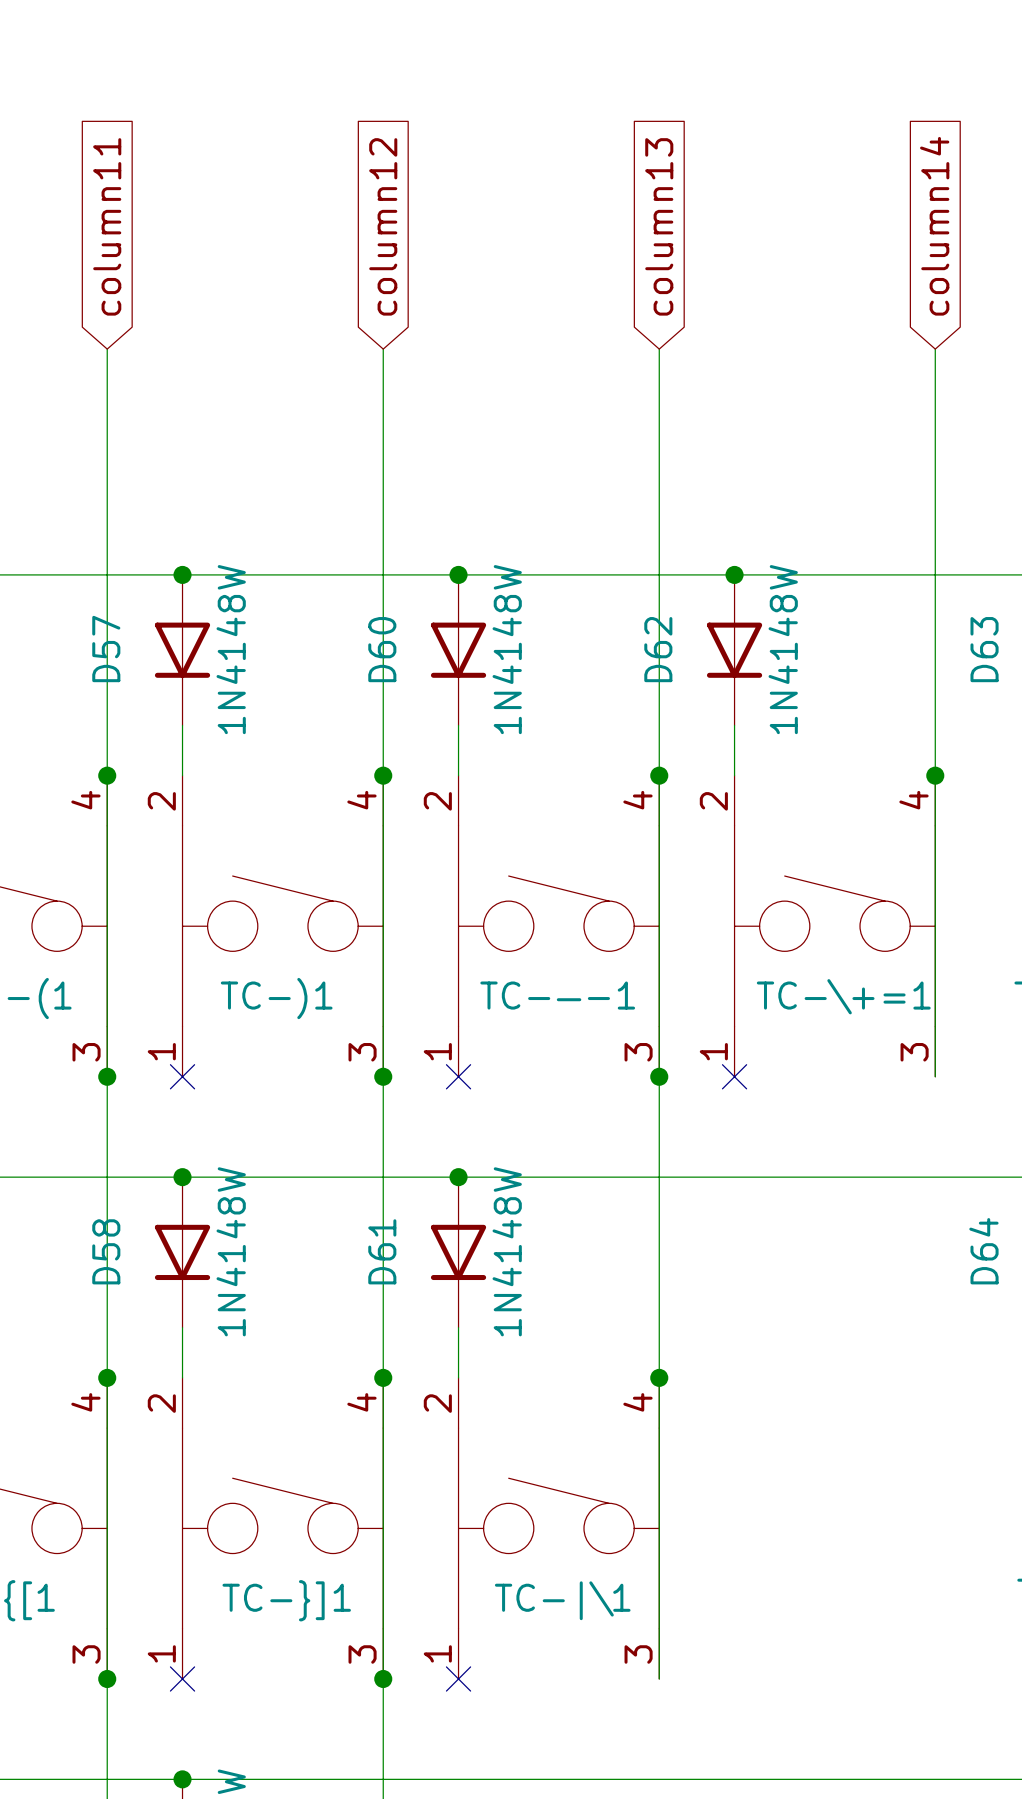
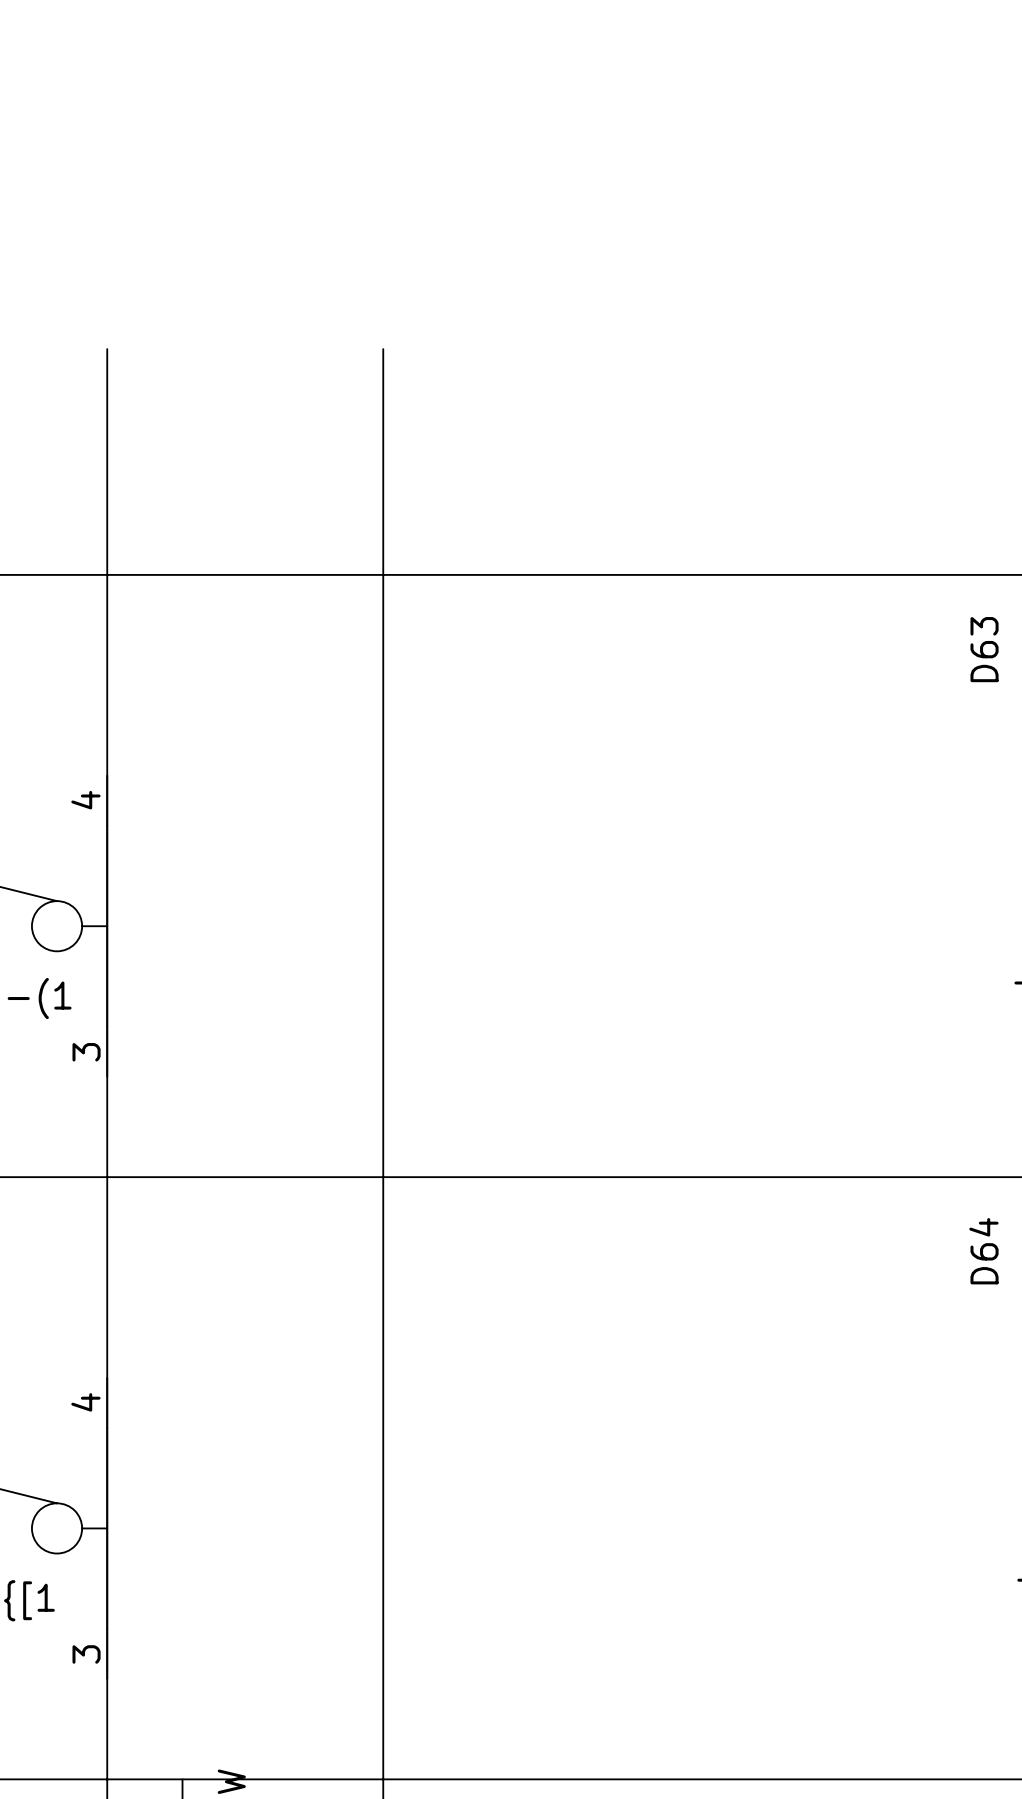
global label: column11 (107, 226) -> none
global label: column12 (383, 226) -> none
global label: column13 (659, 226) -> none
global label: column14 (934, 226) -> none
wire: (659, 349) (659, 1678) -> none
wire: (935, 349) (935, 1076) -> none
junction: (182, 574) -> none
junction: (458, 574) -> none
junction: (734, 574) -> none
D57: 1N4148W (182, 650) -> none
D60: 1N4148W (458, 650) -> none
D62: 1N4148W (734, 650) -> none
wire: (182, 725) (182, 775) -> none
wire: (458, 725) (458, 775) -> none
wire: (734, 725) (734, 775) -> none
junction: (107, 775) -> none
junction: (383, 775) -> none
junction: (659, 775) -> none
junction: (935, 775) -> none
TC-)1: (282, 926) -> none
TC-—-1: (558, 926) -> none
TC-\+=1: (834, 926) -> none
junction: (107, 1076) -> none
no-connect mark: (182, 1076) -> none
junction: (383, 1076) -> none
no-connect mark: (458, 1076) -> none
junction: (659, 1076) -> none
no-connect mark: (734, 1076) -> none
junction: (182, 1177) -> none
junction: (458, 1177) -> none
D58: 1N4148W (182, 1252) -> none
D61: 1N4148W (458, 1252) -> none
wire: (182, 1327) (182, 1377) -> none
wire: (458, 1327) (458, 1377) -> none
junction: (107, 1377) -> none
junction: (383, 1377) -> none
junction: (659, 1377) -> none
TC-}]1: (282, 1528) -> none
TC-|\1: (558, 1528) -> none
junction: (107, 1678) -> none
no-connect mark: (182, 1678) -> none
junction: (383, 1678) -> none
no-connect mark: (458, 1678) -> none
junction: (182, 1779) -> none

